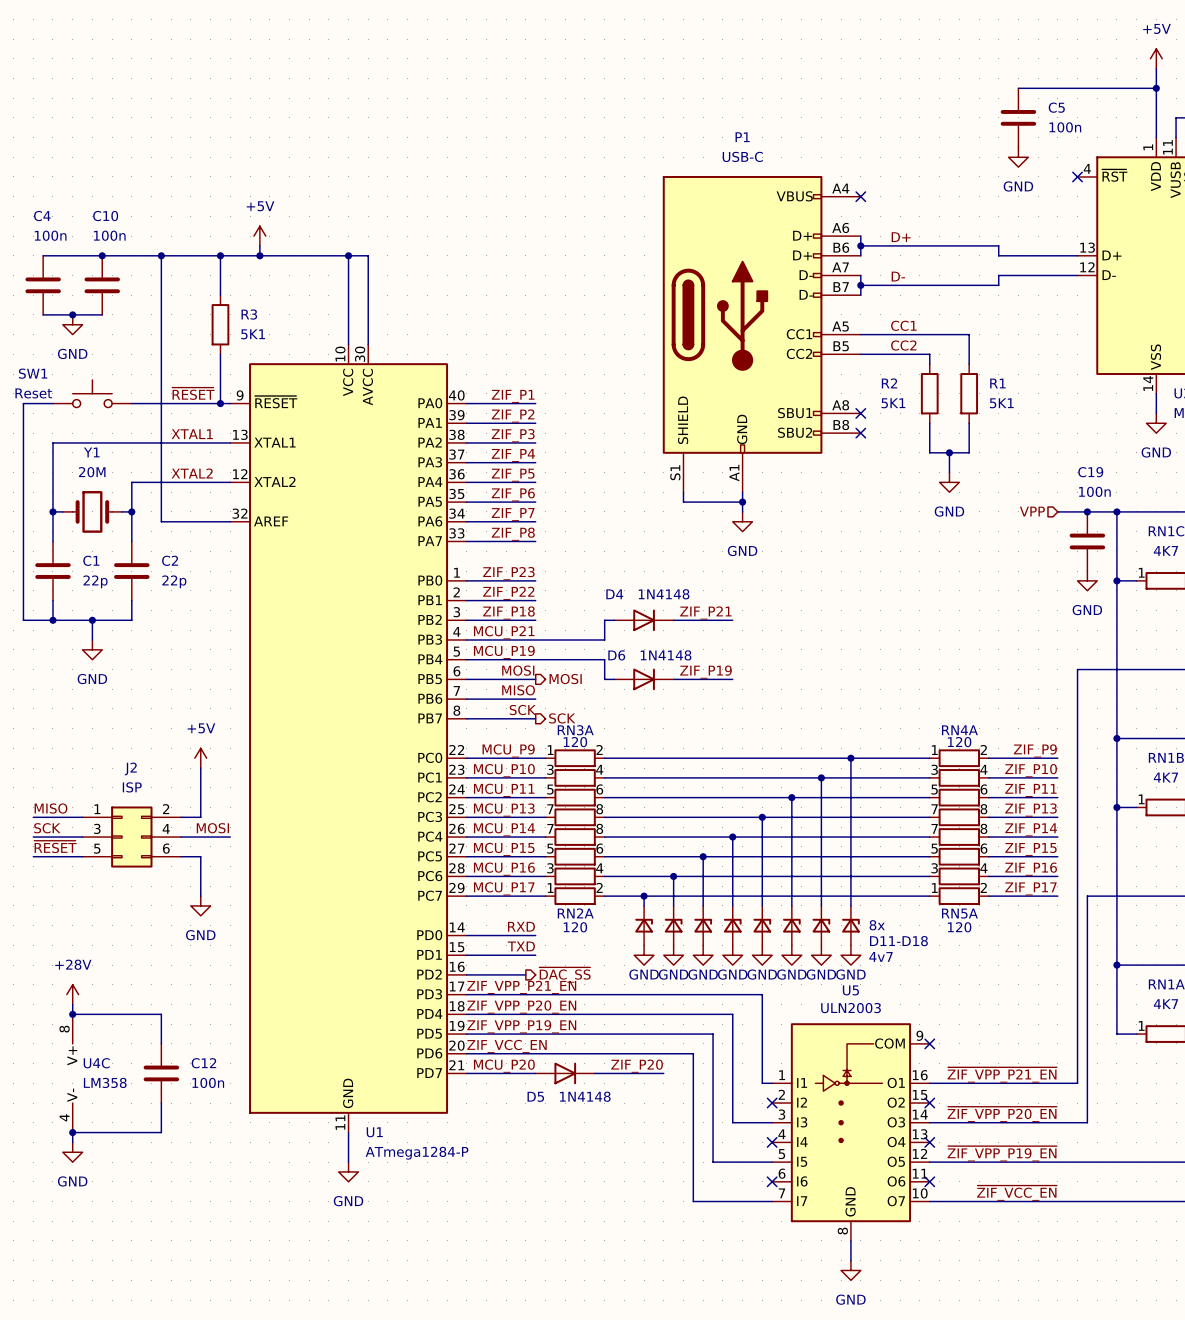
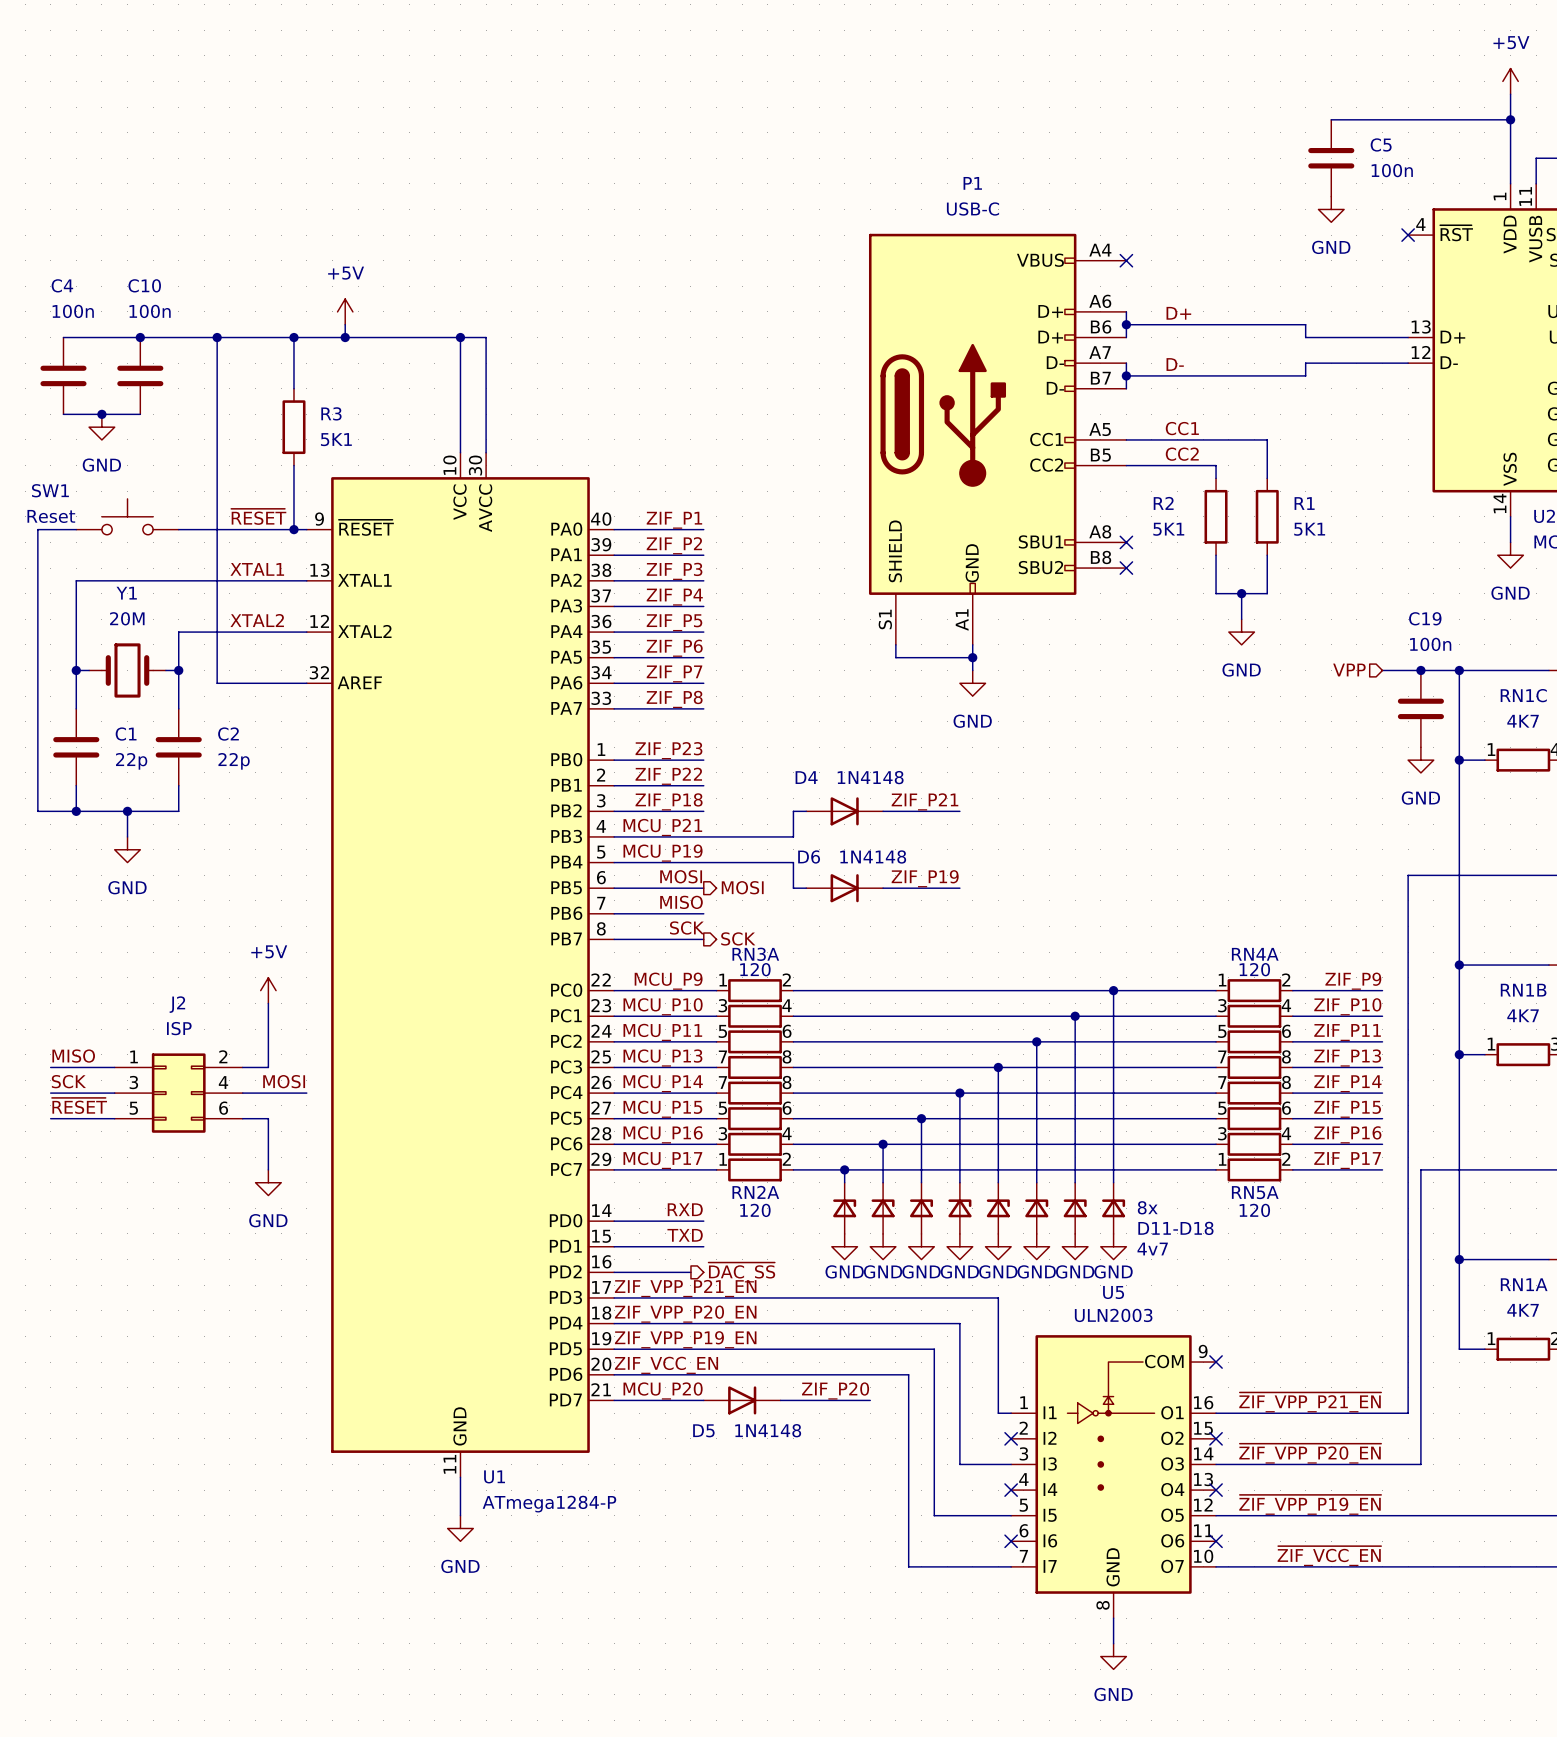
power symbol: +28V (72, 994) -> none
wire: (72, 1004) (72, 1014) (161, 1014) (161, 1043) -> none
junction: (72, 1014) -> none
U4C: LM358 (72, 1073) -> none
C12: 100n (161, 1073) -> none
wire: (161, 1103) (161, 1132) (72, 1132) (72, 1142) -> none
junction: (72, 1132) -> none
power symbol: GND (72, 1152) -> none

